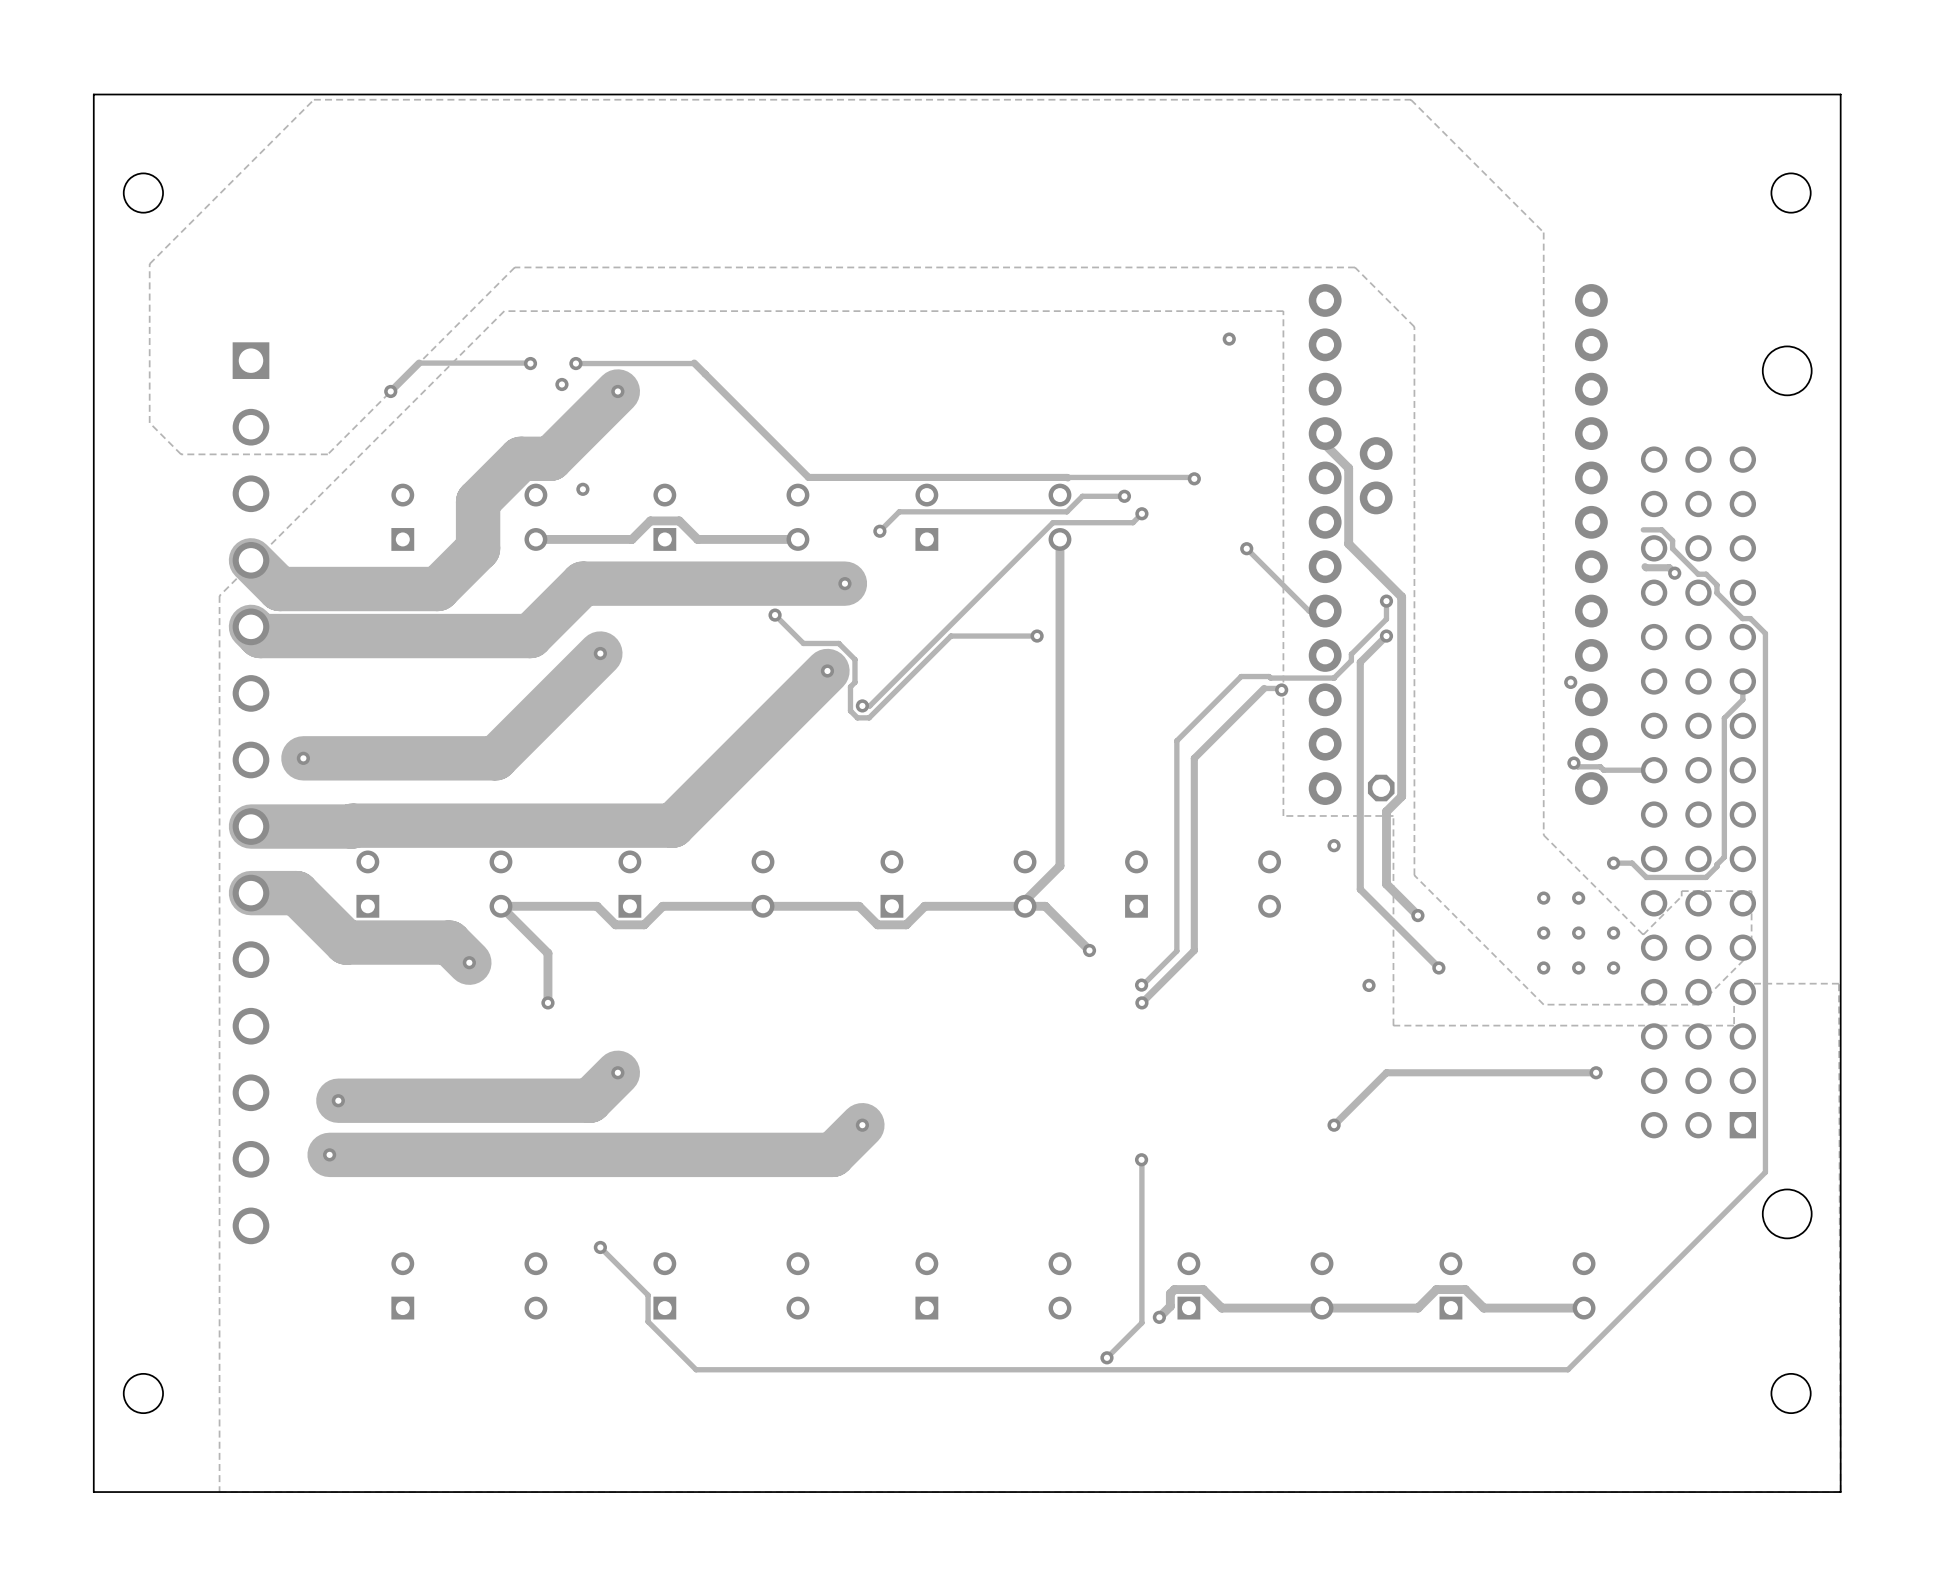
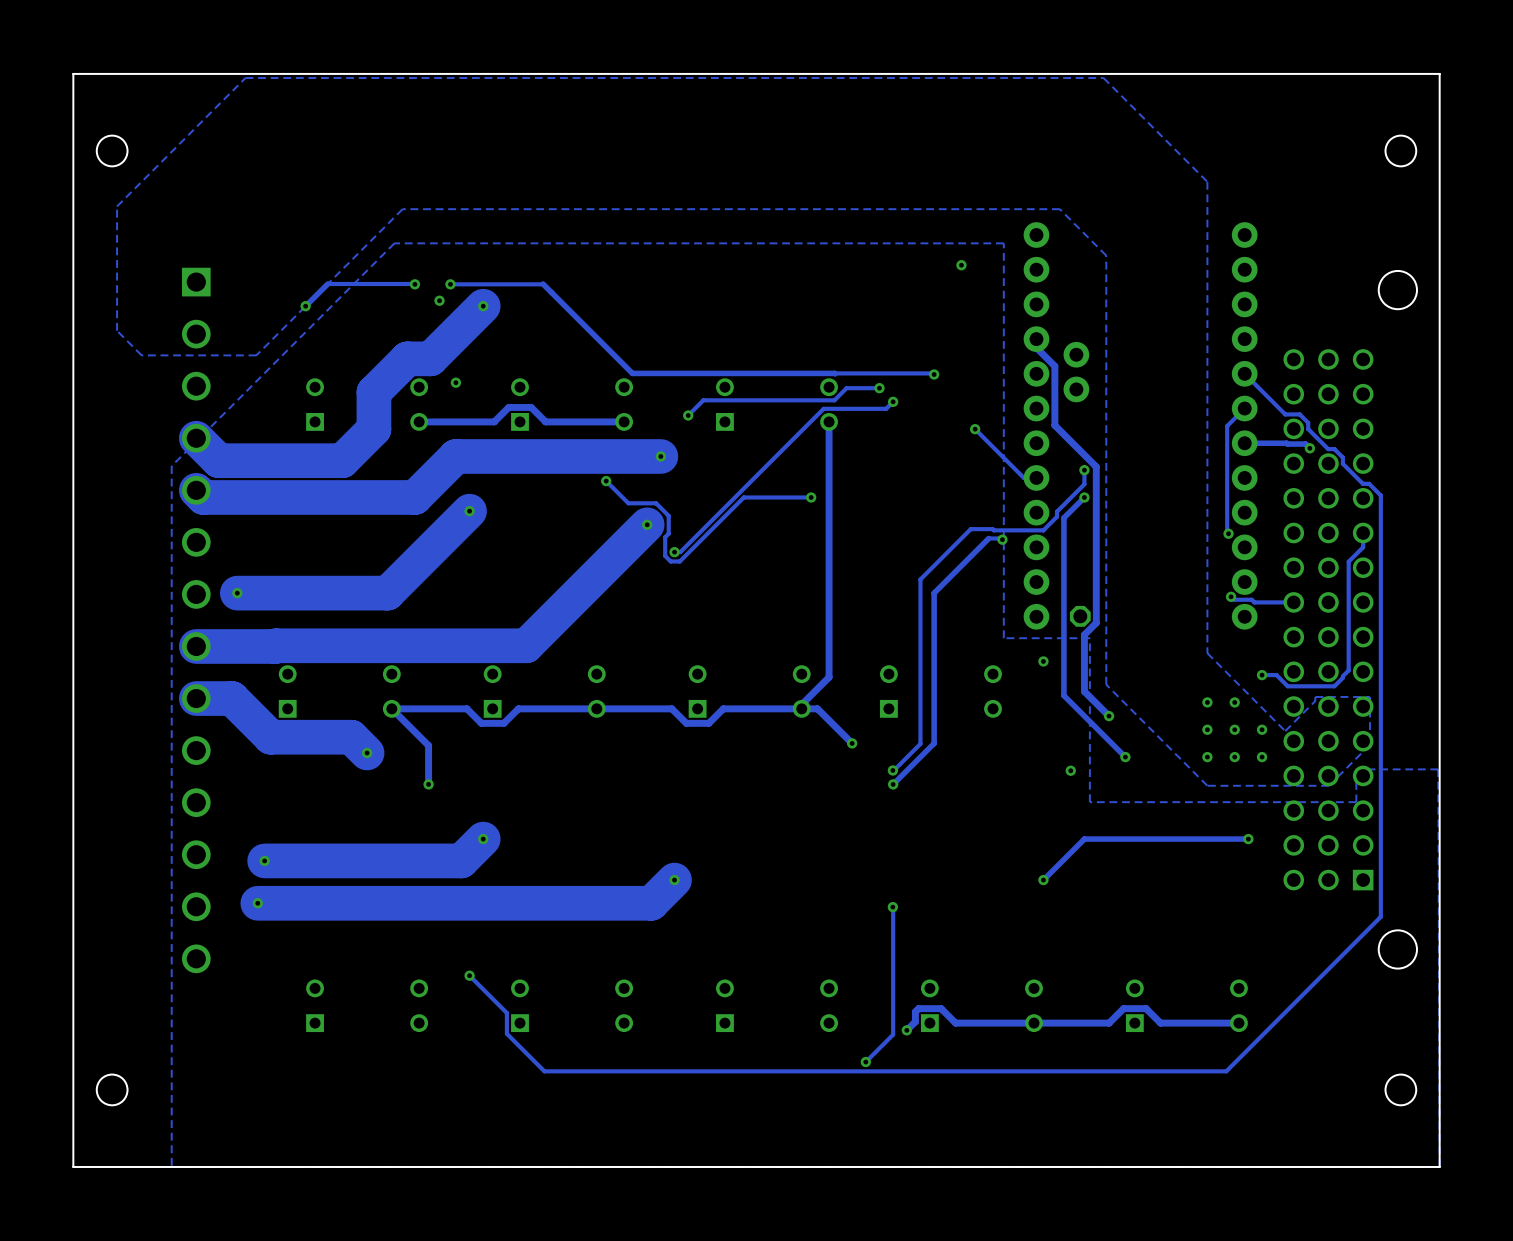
track: none -> (1244, 373) (1285, 414)
track: none -> (1244, 408) (1227, 426) (1227, 532)
track: none -> (1286, 443) (1244, 443)

